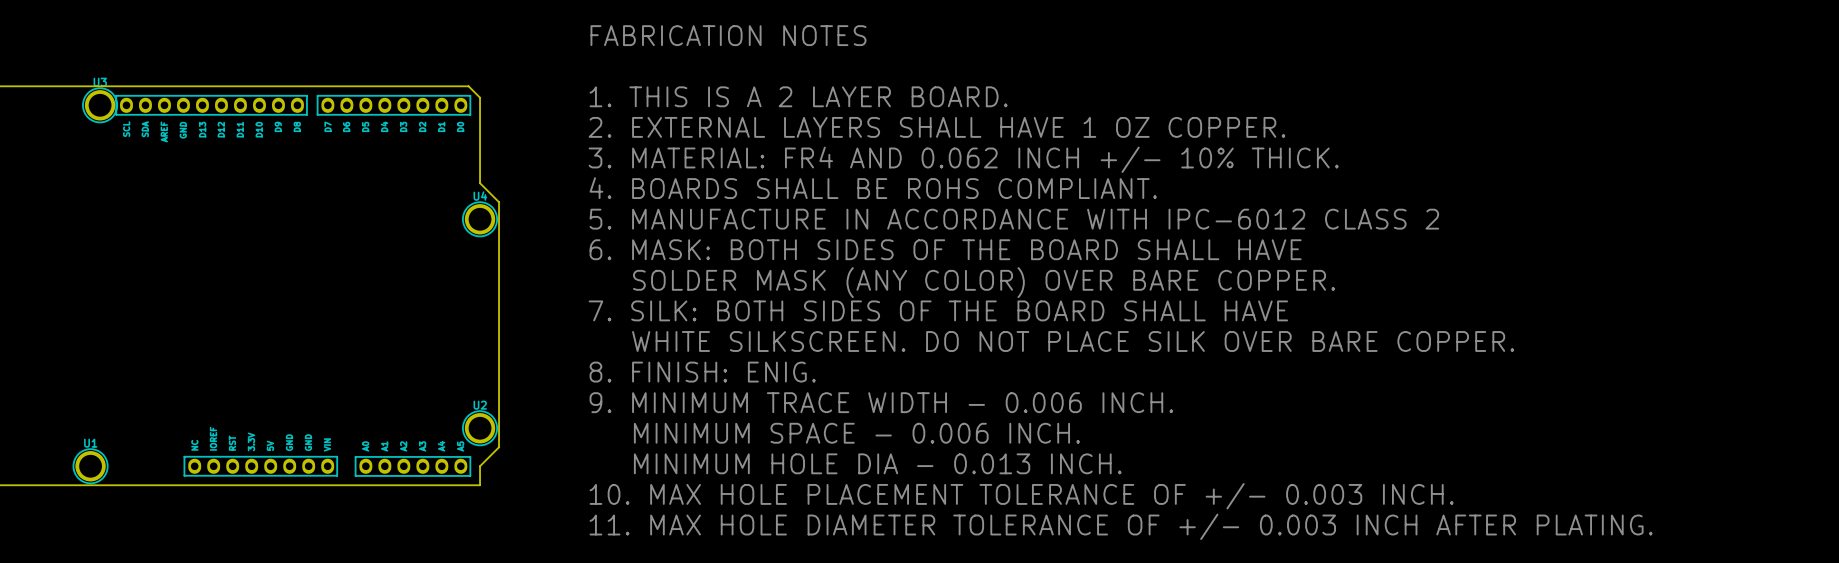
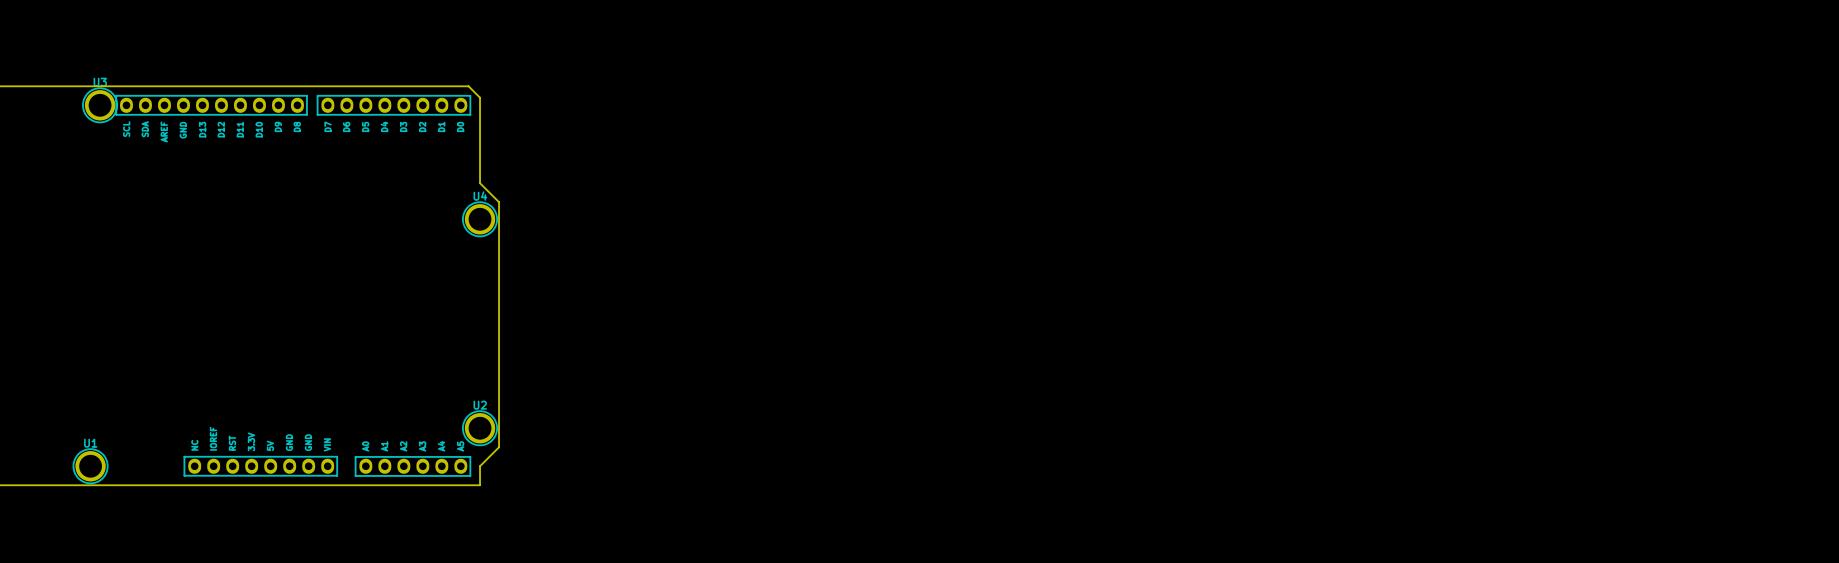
text: FABRICATION NOTES (728, 35) -> none
text: 1. THIS IS A 2 LAYER BOARD. (798, 96) -> none
text: 2. EXTERNAL LAYERS SHALL HAVE 1 OZ COPPER. (937, 127) -> none
text: 3. MATERIAL: FR4 AND 0.062 INCH +/- 10% THICK. (963, 159) -> none
text: 4. BOARDS SHALL BE ROHS COMPLIANT. (873, 188) -> none
text: 5. MANUFACTURE IN ACCORDANCE WITH IPC-6012 CLASS 2 (1014, 219) -> none
text: 6. MASK: BOTH SIDES OF THE BOARD SHALL HAVE (945, 249) -> none
text: SOLDER MASK (ANY COLOR) OVER BARE COPPER. (984, 282) -> none
text: 7. SILK: BOTH SIDES OF THE BOARD SHALL HAVE (938, 310) -> none
text: WHITE SILKSCREEN. DO NOT PLACE SILK OVER BARE COPPER. (1073, 341) -> none
text: 8. FINISH: ENIG. (702, 372) -> none
text: 9. MINIMUM TRACE WIDTH - 0.006 INCH. (881, 402) -> none
text: MINIMUM SPACE - 0.006 INCH. (856, 433) -> none
text: MINIMUM HOLE DIA - 0.013 INCH. (877, 463) -> none
text: 10. MAX HOLE PLACEMENT TOLERANCE OF +/- 0.003 INCH. (1021, 496) -> none
text: 11. MAX HOLE DIAMETER TOLERANCE OF +/- 0.003 INCH AFTER PLATING. (1121, 526) -> none

